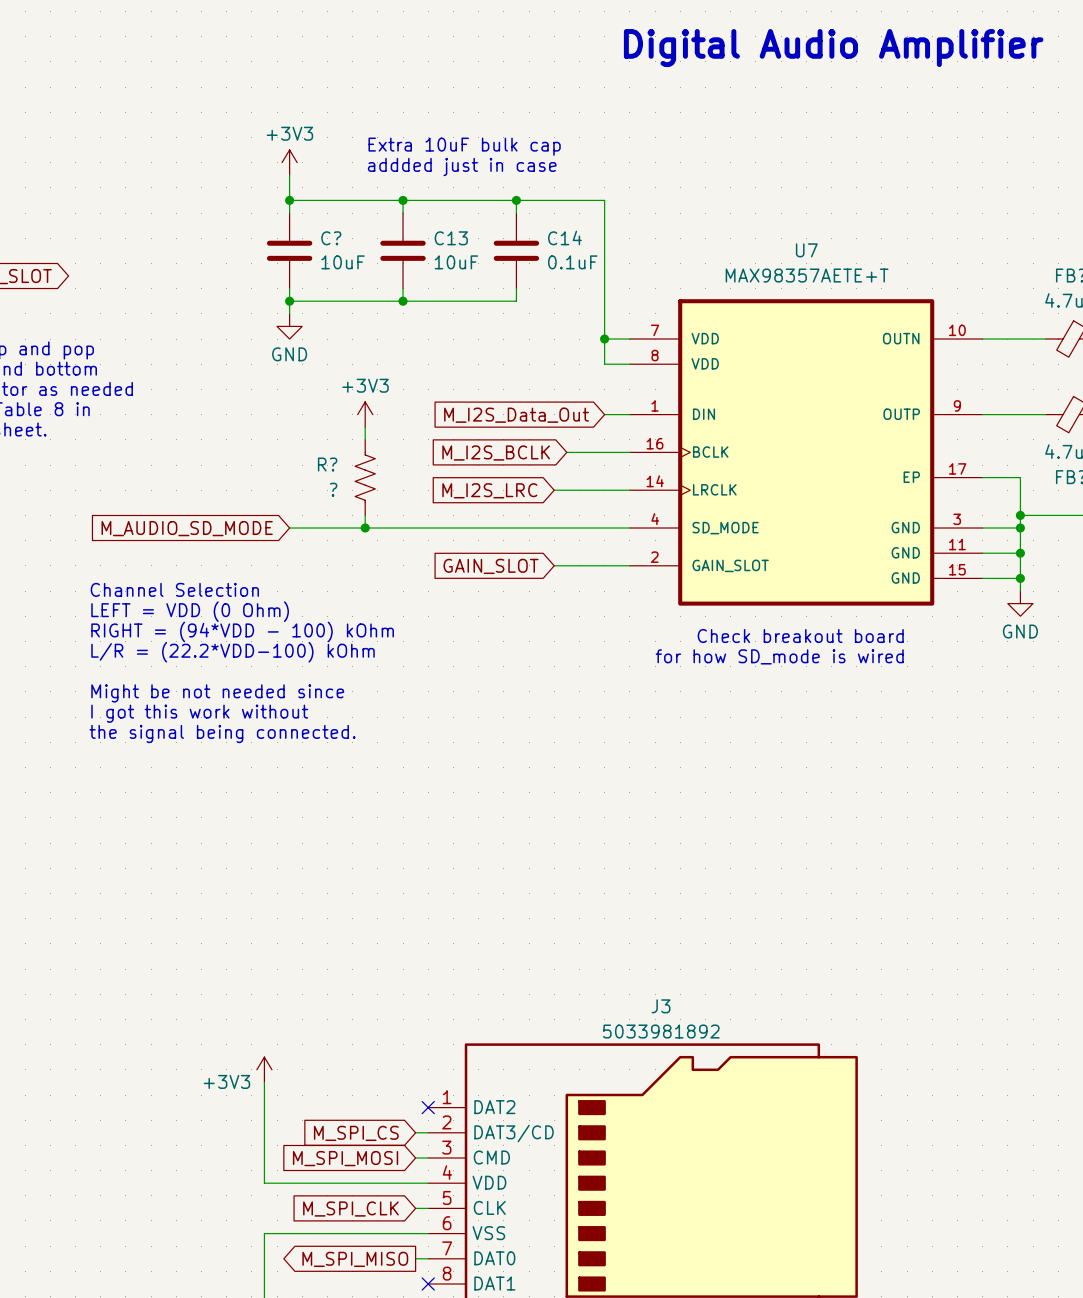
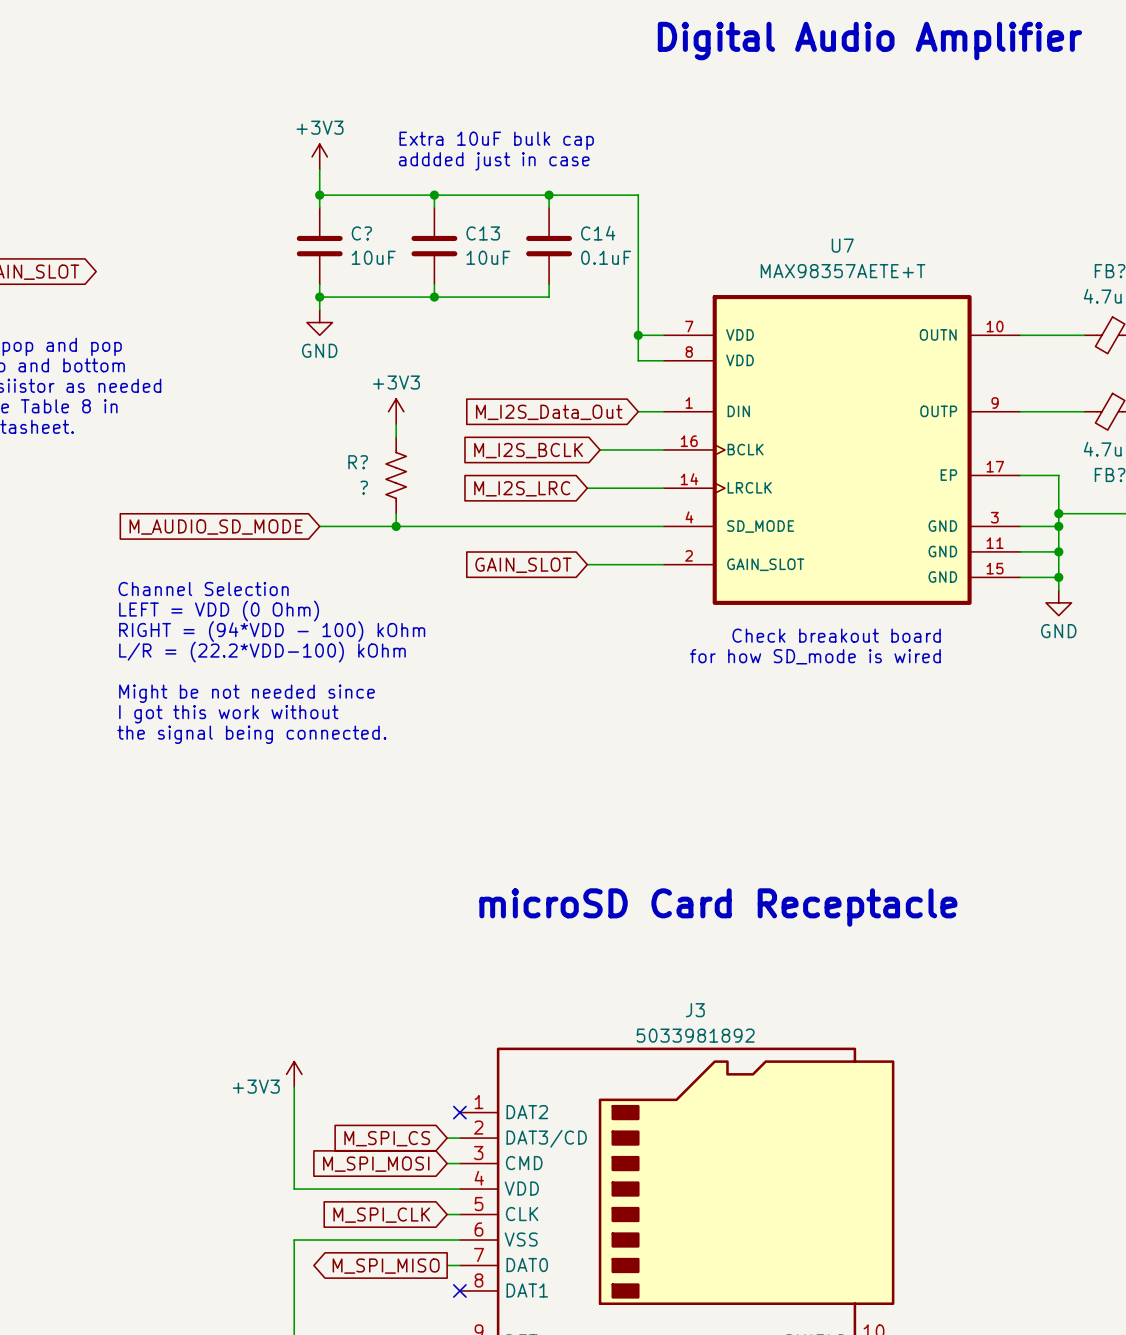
text: none -> microSD Card Receptacle (718, 907)

